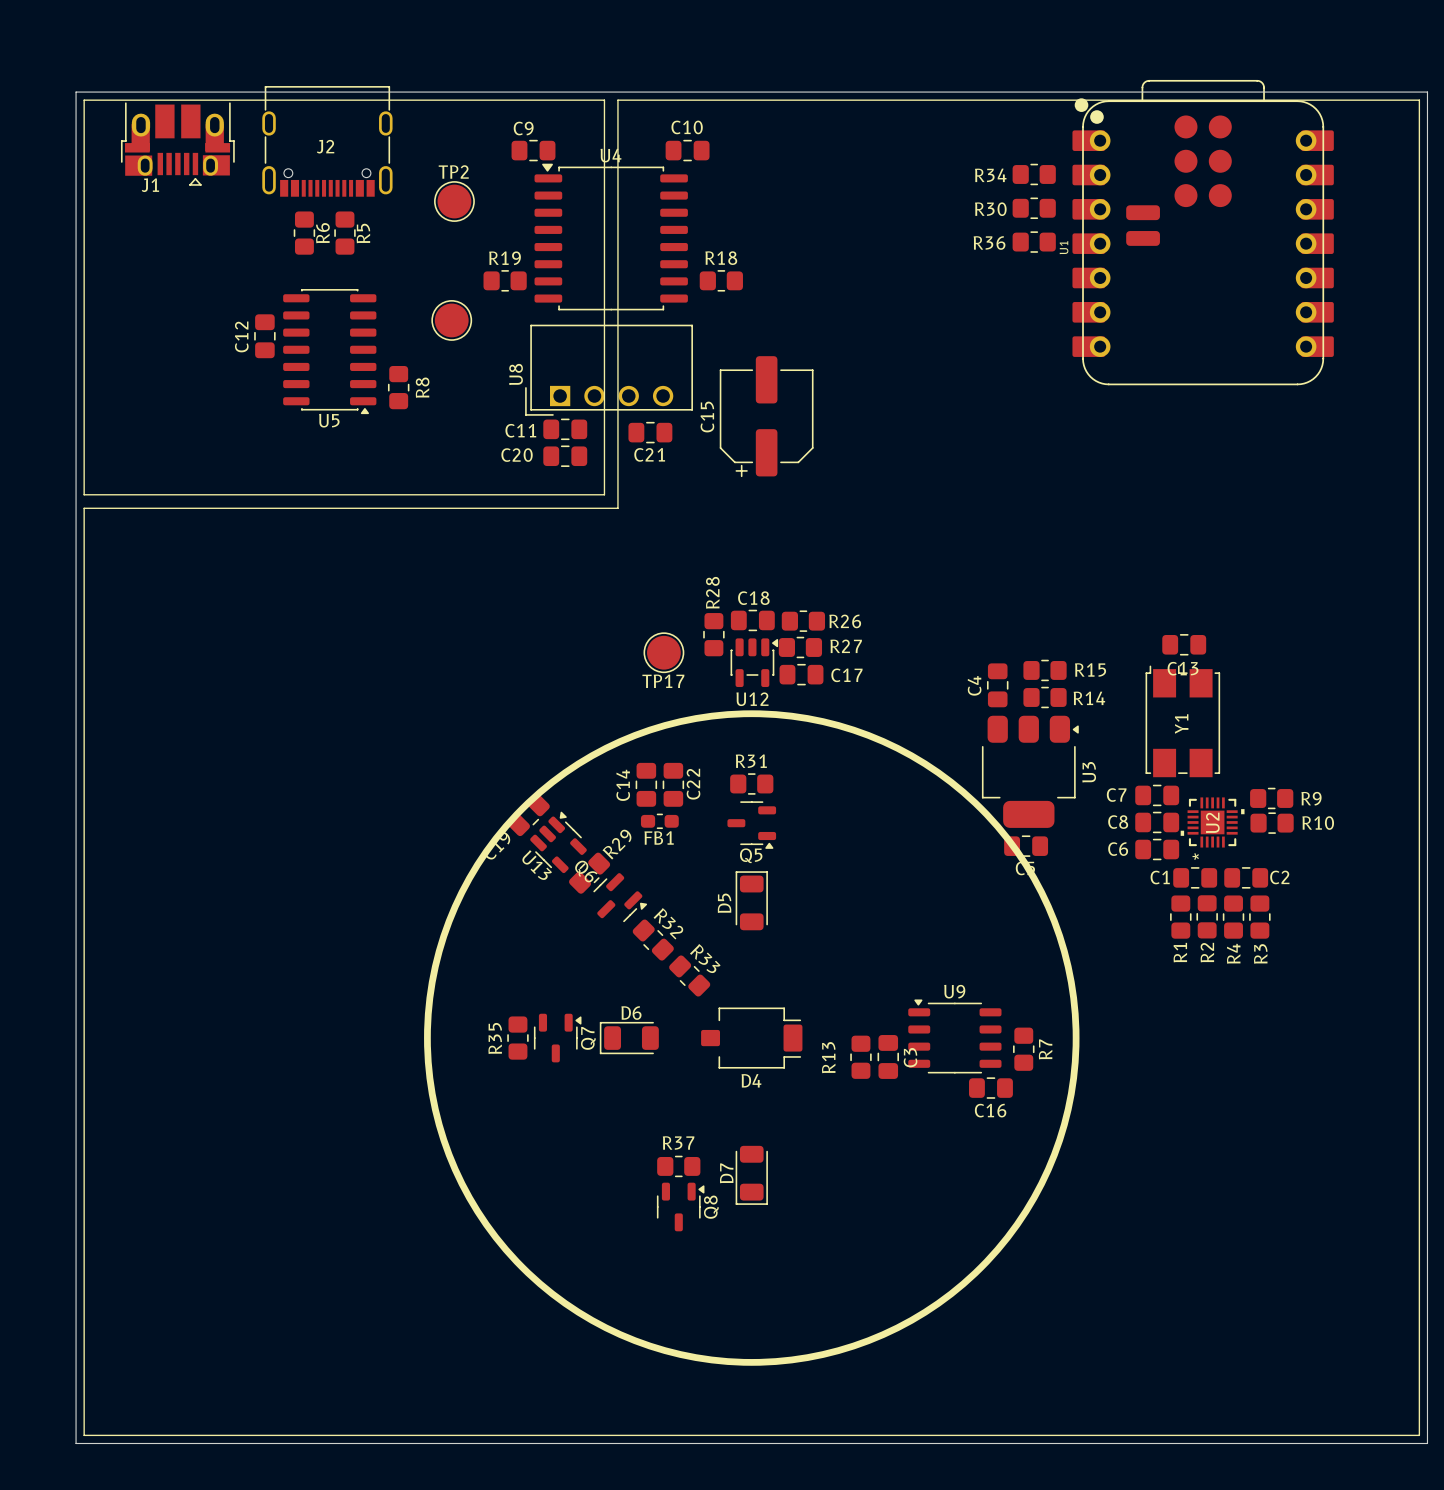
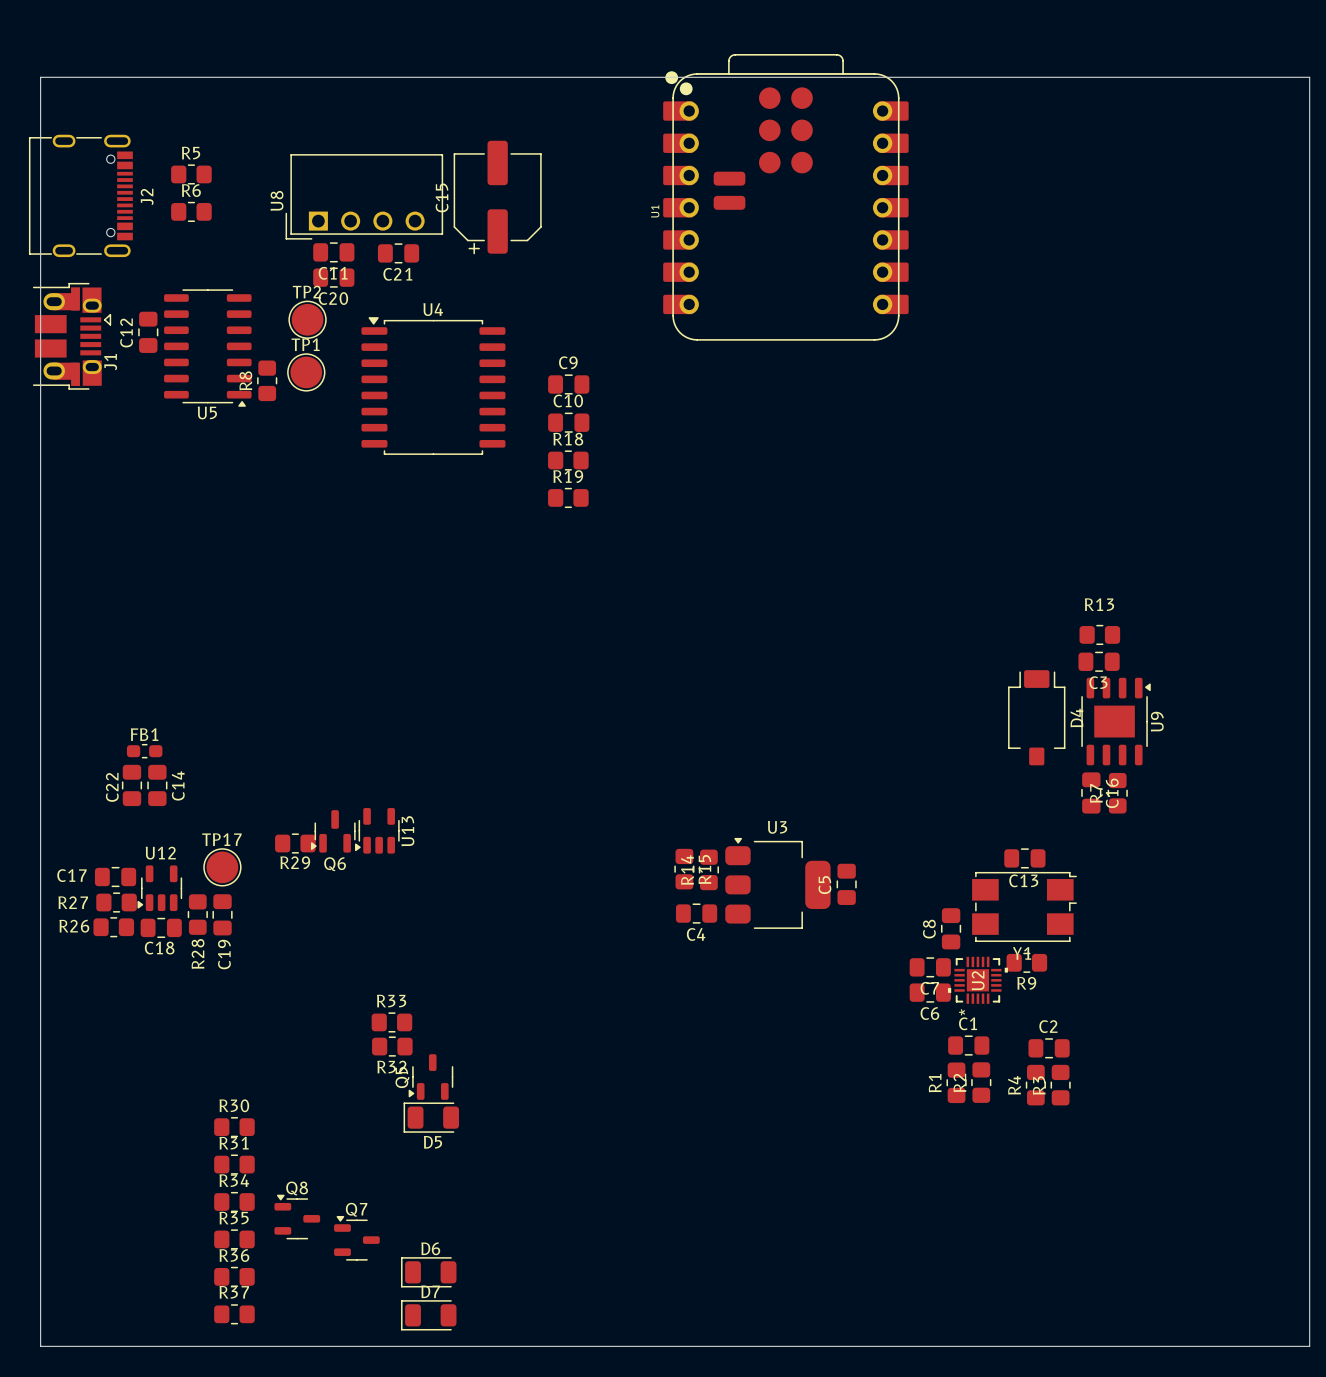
line: (84, 100) (604, 100) (604, 494) (84, 494) (84, 100) -> none
line: (617, 100) (1419, 100) (1419, 1435) (84, 1435) (84, 508) (617, 508) (617, 100) -> none
C9 name position: C9 (523, 128) -> C9 (568, 362)
J2 rotation: 0° (327, 141) -> 90° counterclockwise (80, 195)
J2 position: (327, 141) -> (80, 195)
J1 rotation: 0° (177, 144) -> 90° counterclockwise (72, 336)
J1 position: (177, 144) -> (72, 336)
J2 name position: J2 (325, 146) -> J2 (147, 196)
C9 position: (533, 150) -> (568, 384)
C10 position: (687, 150) -> (568, 422)
R34 position: (1034, 174) -> (234, 1202)
R34 name position: R34 (990, 175) -> R34 (234, 1180)
TP2 position: (454, 201) -> (307, 319)
R30 position: (1034, 208) -> (234, 1127)
R30 name position: R30 (990, 209) -> R30 (234, 1105)
U1 position: (1203, 232) -> (785, 197)
R6 rotation: 0° (304, 233) -> 90° clockwise (191, 211)
R6 position: (304, 233) -> (191, 211)
R6 name position: R6 (322, 233) -> R6 (191, 190)
R5 rotation: 0° (344, 233) -> 90° clockwise (191, 174)
R5 position: (344, 233) -> (191, 174)
R5 name position: R5 (363, 233) -> R5 (191, 153)
U4 position: (611, 237) -> (433, 386)
R36 name position: R36 (989, 242) -> R36 (234, 1255)
R36 position: (1034, 242) -> (234, 1276)
R19 position: (505, 280) -> (568, 497)
R18 position: (721, 280) -> (568, 460)
U5 footprint: [283, 289, 377, 415] -> [164, 289, 252, 407]
part: (451, 320) -> none
C12 position: (264, 336) -> (148, 332)
U8 position: (609, 370) -> (364, 196)
R8 position: (398, 387) -> (267, 380)
R8 name position: R8 (422, 387) -> R8 (245, 380)
TP1: none -> (306, 372)
C15 position: (766, 416) -> (497, 197)
C11 position: (565, 429) -> (333, 252)
C11 name position: C11 (520, 430) -> C11 (333, 273)
C21 position: (650, 432) -> (398, 253)
C20 name position: C20 (517, 455) -> C20 (333, 298)
C20 position: (565, 456) -> (333, 277)
R28 name position: R28 (712, 592) -> R28 (198, 953)
C18 name position: C18 (753, 598) -> C18 (159, 948)
C18 position: (752, 620) -> (161, 927)
R26 position: (803, 621) -> (113, 927)
R26 name position: R26 (845, 621) -> R26 (74, 926)
R28 position: (713, 634) -> (197, 914)
U12 footprint: [730, 638, 779, 688] -> [137, 865, 183, 912]
C13 position: (1184, 644) -> (1024, 858)
R27 name position: R27 (846, 646) -> R27 (73, 902)
R27 position: (800, 647) -> (116, 902)
TP17 position: (663, 652) -> (222, 867)
R15 rotation: 0° (1045, 670) -> 90° clockwise (684, 869)
R15 position: (1045, 670) -> (684, 869)
C17 position: (801, 674) -> (115, 877)
C17 name position: C17 (846, 675) -> C17 (71, 875)
TP17 name position: TP17 (663, 681) -> TP17 (221, 839)
C4 name position: C4 (974, 685) -> C4 (696, 934)
C4 rotation: 0° (997, 685) -> 90° clockwise (696, 913)
C4 position: (997, 685) -> (696, 913)
R14 rotation: 0° (1045, 697) -> 90° clockwise (708, 869)
R14 position: (1045, 697) -> (708, 869)
R14 name position: R14 (1089, 698) -> R14 (687, 870)
U12 name position: U12 (752, 699) -> U12 (160, 853)
drawing: [424, 710, 1080, 1366] -> none
Y1 rotation: 0° (1182, 721) -> 90° clockwise (1024, 906)
Y1 position: (1182, 721) -> (1024, 906)
Y1 name position: Y1 (1181, 723) -> Y1 (1022, 953)
U3 rotation: 0° (1030, 771) -> 90° counterclockwise (777, 883)
U3 position: (1030, 771) -> (777, 883)
R31 position: (751, 783) -> (234, 1164)
C14 position: (646, 784) -> (157, 785)
C22 position: (673, 784) -> (131, 785)
C22 name position: C22 (693, 784) -> C22 (112, 787)
C14 name position: C14 (623, 785) -> C14 (178, 785)
C7 name position: C7 (1116, 795) -> C7 (929, 988)
C7 position: (1157, 795) -> (930, 967)
R9 position: (1271, 798) -> (1026, 962)
R9 name position: R9 (1311, 798) -> R9 (1026, 983)
C19 rotation: 0° (528, 815) -> 45° counterclockwise (222, 914)
C19 position: (528, 815) -> (222, 914)
FB1 position: (659, 821) -> (144, 751)
C8 rotation: 0° (1157, 822) -> 90° clockwise (951, 928)
C8 position: (1157, 822) -> (951, 928)
U2 position: (1212, 822) -> (977, 980)
R10: (1272, 823) -> none
Q5 rotation: 0° (751, 825) -> 90° clockwise (430, 1077)
Q5 position: (751, 825) -> (430, 1077)
FB1 name position: FB1 (659, 837) -> FB1 (144, 734)
U13 rotation: 0° (558, 842) -> 135° counterclockwise (377, 830)
U13 position: (558, 842) -> (377, 830)
R29 name position: R29 (616, 844) -> R29 (295, 862)
C5 rotation: 0° (1026, 846) -> 90° clockwise (846, 884)
C5 position: (1026, 846) -> (846, 884)
C6 name position: C6 (1118, 849) -> C6 (929, 1013)
C6 position: (1157, 849) -> (930, 992)
Q6 name position: Q6 (586, 871) -> Q6 (335, 864)
R29 rotation: 0° (589, 873) -> 45° clockwise (295, 843)
R29 position: (589, 873) -> (295, 843)
C1 name position: C1 (1160, 877) -> C1 (968, 1023)
C1 position: (1195, 877) -> (968, 1045)
C2 position: (1246, 877) -> (1049, 1048)
C2 name position: C2 (1279, 877) -> C2 (1048, 1026)
Q6 rotation: 0° (620, 897) -> 135° clockwise (333, 831)
Q6 position: (620, 897) -> (333, 831)
D5 rotation: 0° (751, 900) -> 90° counterclockwise (431, 1117)
D5 position: (751, 900) -> (431, 1117)
R2 position: (1207, 916) -> (981, 1082)
R1 position: (1180, 917) -> (956, 1082)
R4 position: (1233, 917) -> (1035, 1085)
R3 position: (1259, 917) -> (1060, 1085)
R32 name position: R32 (668, 923) -> R32 (391, 1067)
R32 rotation: 0° (653, 940) -> 45° counterclockwise (392, 1046)
R32 position: (653, 940) -> (392, 1046)
R1 name position: R1 (1180, 952) -> R1 (935, 1083)
R2 name position: R2 (1207, 952) -> R2 (959, 1082)
R4 name position: R4 (1233, 953) -> R4 (1014, 1085)
R3 name position: R3 (1260, 953) -> R3 (1039, 1085)
R33 rotation: 0° (689, 975) -> 45° counterclockwise (391, 1022)
R33 position: (689, 975) -> (391, 1022)
U9 name position: U9 (954, 991) -> U9 (1157, 721)
U9 footprint: [908, 999, 1002, 1074] -> [1081, 677, 1151, 766]
R35 rotation: 0° (517, 1038) -> 90° clockwise (234, 1239)
R35 position: (517, 1038) -> (234, 1239)
Q7 rotation: 0° (557, 1038) -> 90° counterclockwise (356, 1238)
Q7 position: (557, 1038) -> (356, 1238)
D6 position: (629, 1038) -> (428, 1272)
D4 rotation: 0° (751, 1038) -> 90° counterclockwise (1036, 717)
D4 position: (751, 1038) -> (1036, 717)
R7 position: (1023, 1049) -> (1117, 793)
R7 name position: R7 (1045, 1049) -> R7 (1096, 793)
C3 rotation: 0° (888, 1056) -> 90° clockwise (1099, 661)
C3 position: (888, 1056) -> (1099, 661)
R13 rotation: 0° (860, 1057) -> 90° clockwise (1099, 634)
R13 position: (860, 1057) -> (1099, 634)
C16 rotation: 0° (990, 1088) -> 90° clockwise (1091, 792)
C16 position: (990, 1088) -> (1091, 792)
C16 name position: C16 (990, 1110) -> C16 (1112, 793)
R37 position: (678, 1166) -> (234, 1314)
D7 rotation: 0° (751, 1175) -> 90° clockwise (428, 1315)
D7 position: (751, 1175) -> (428, 1315)
Q8 rotation: 0° (680, 1206) -> 90° counterclockwise (297, 1217)
Q8 position: (680, 1206) -> (297, 1217)

